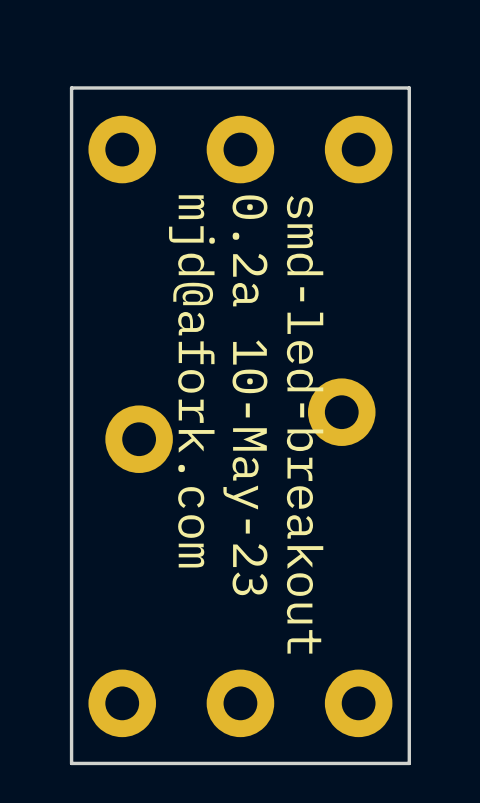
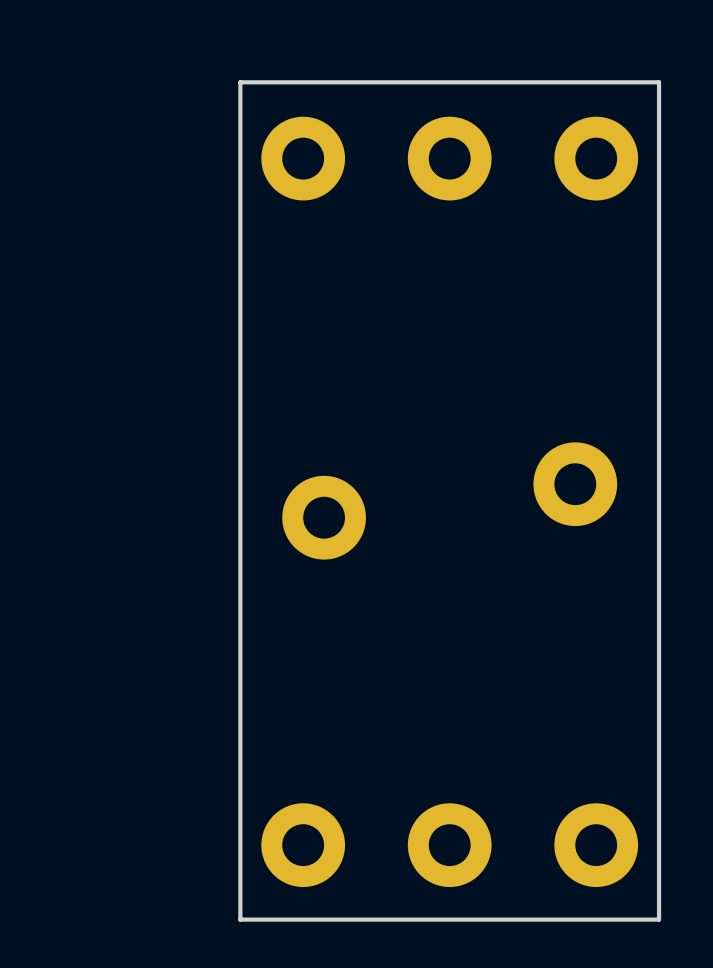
text: mjd@afork.com (191, 381) -> none
text: 0.2a 10-May-23 (245, 395) -> none
text: smd-led-breakout (305, 424) -> none

